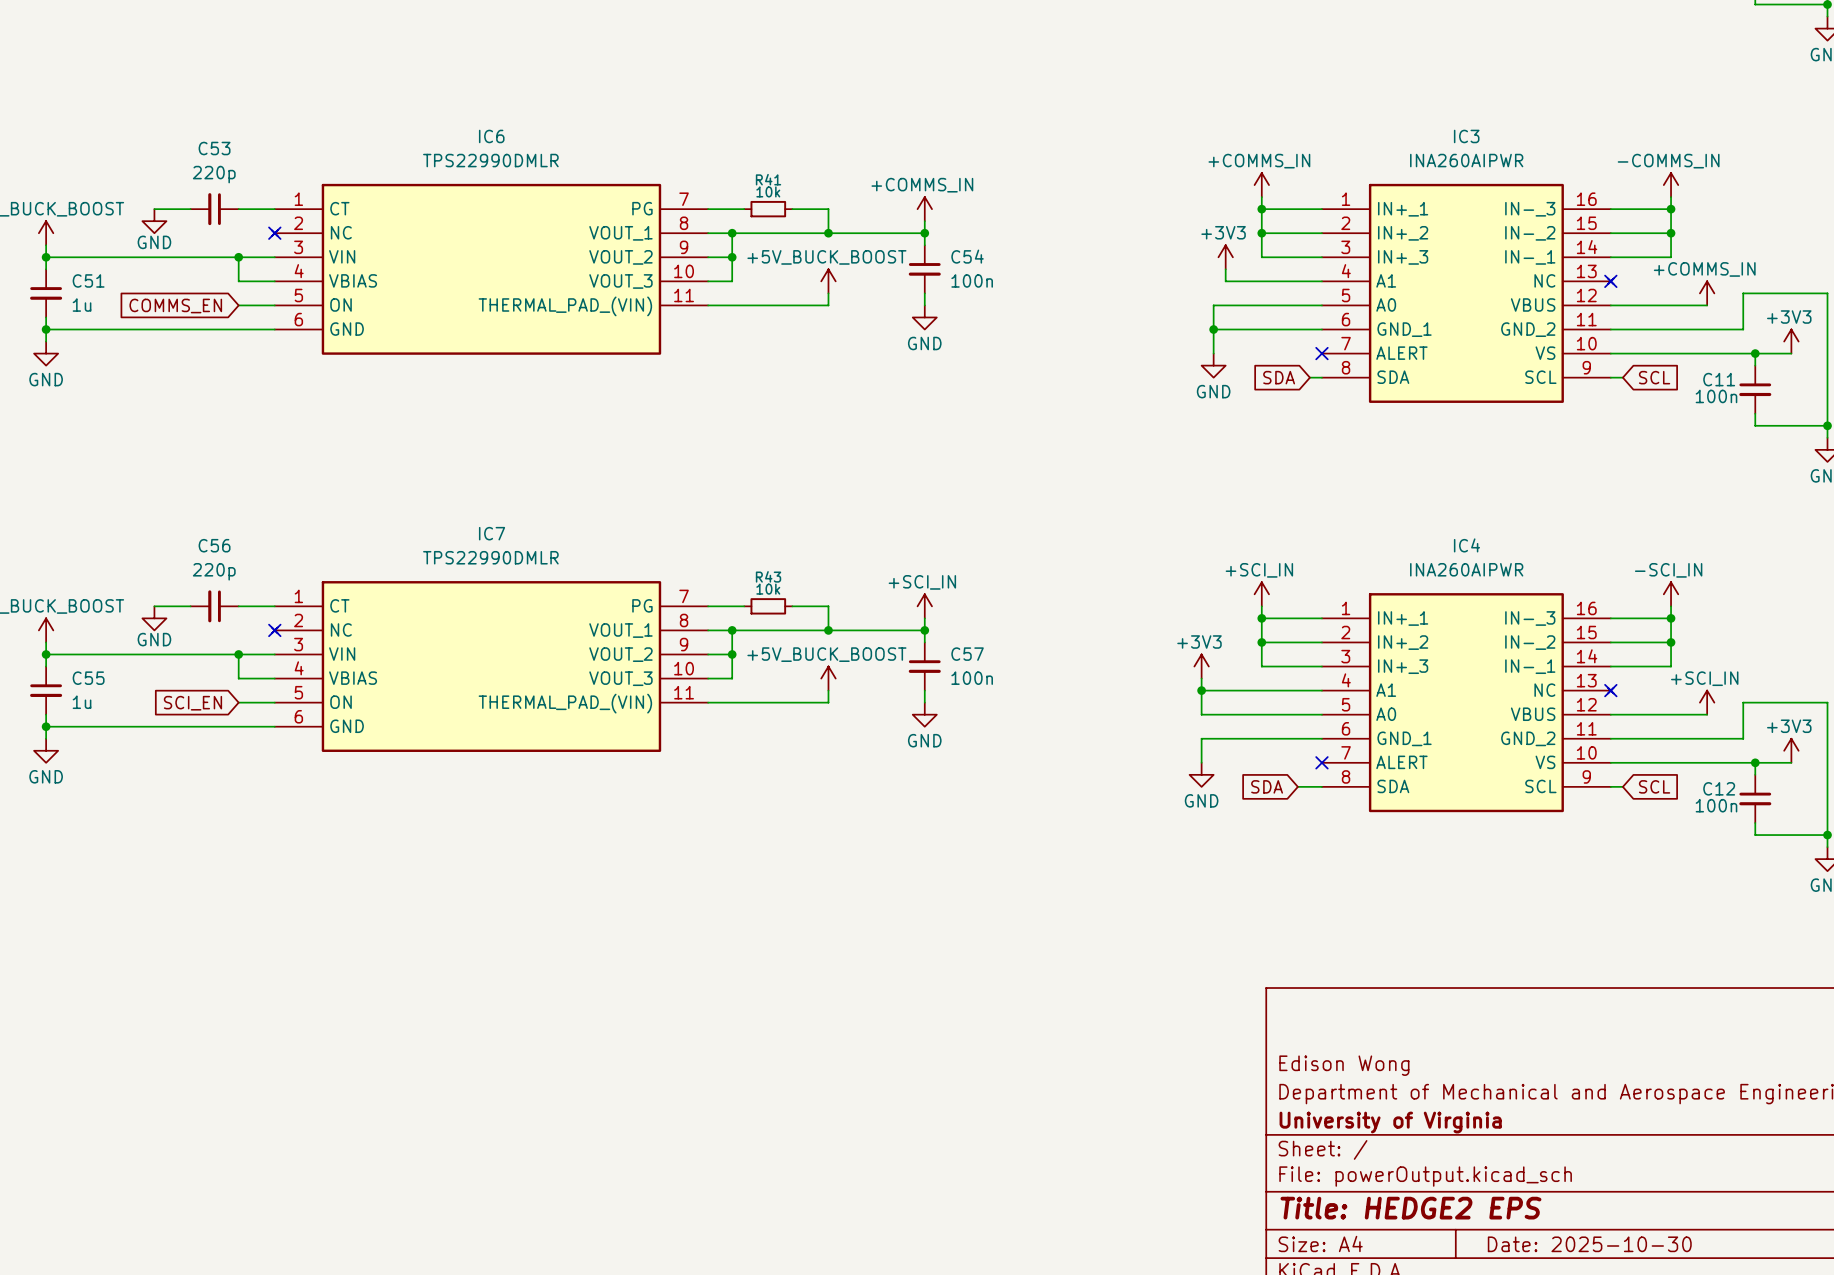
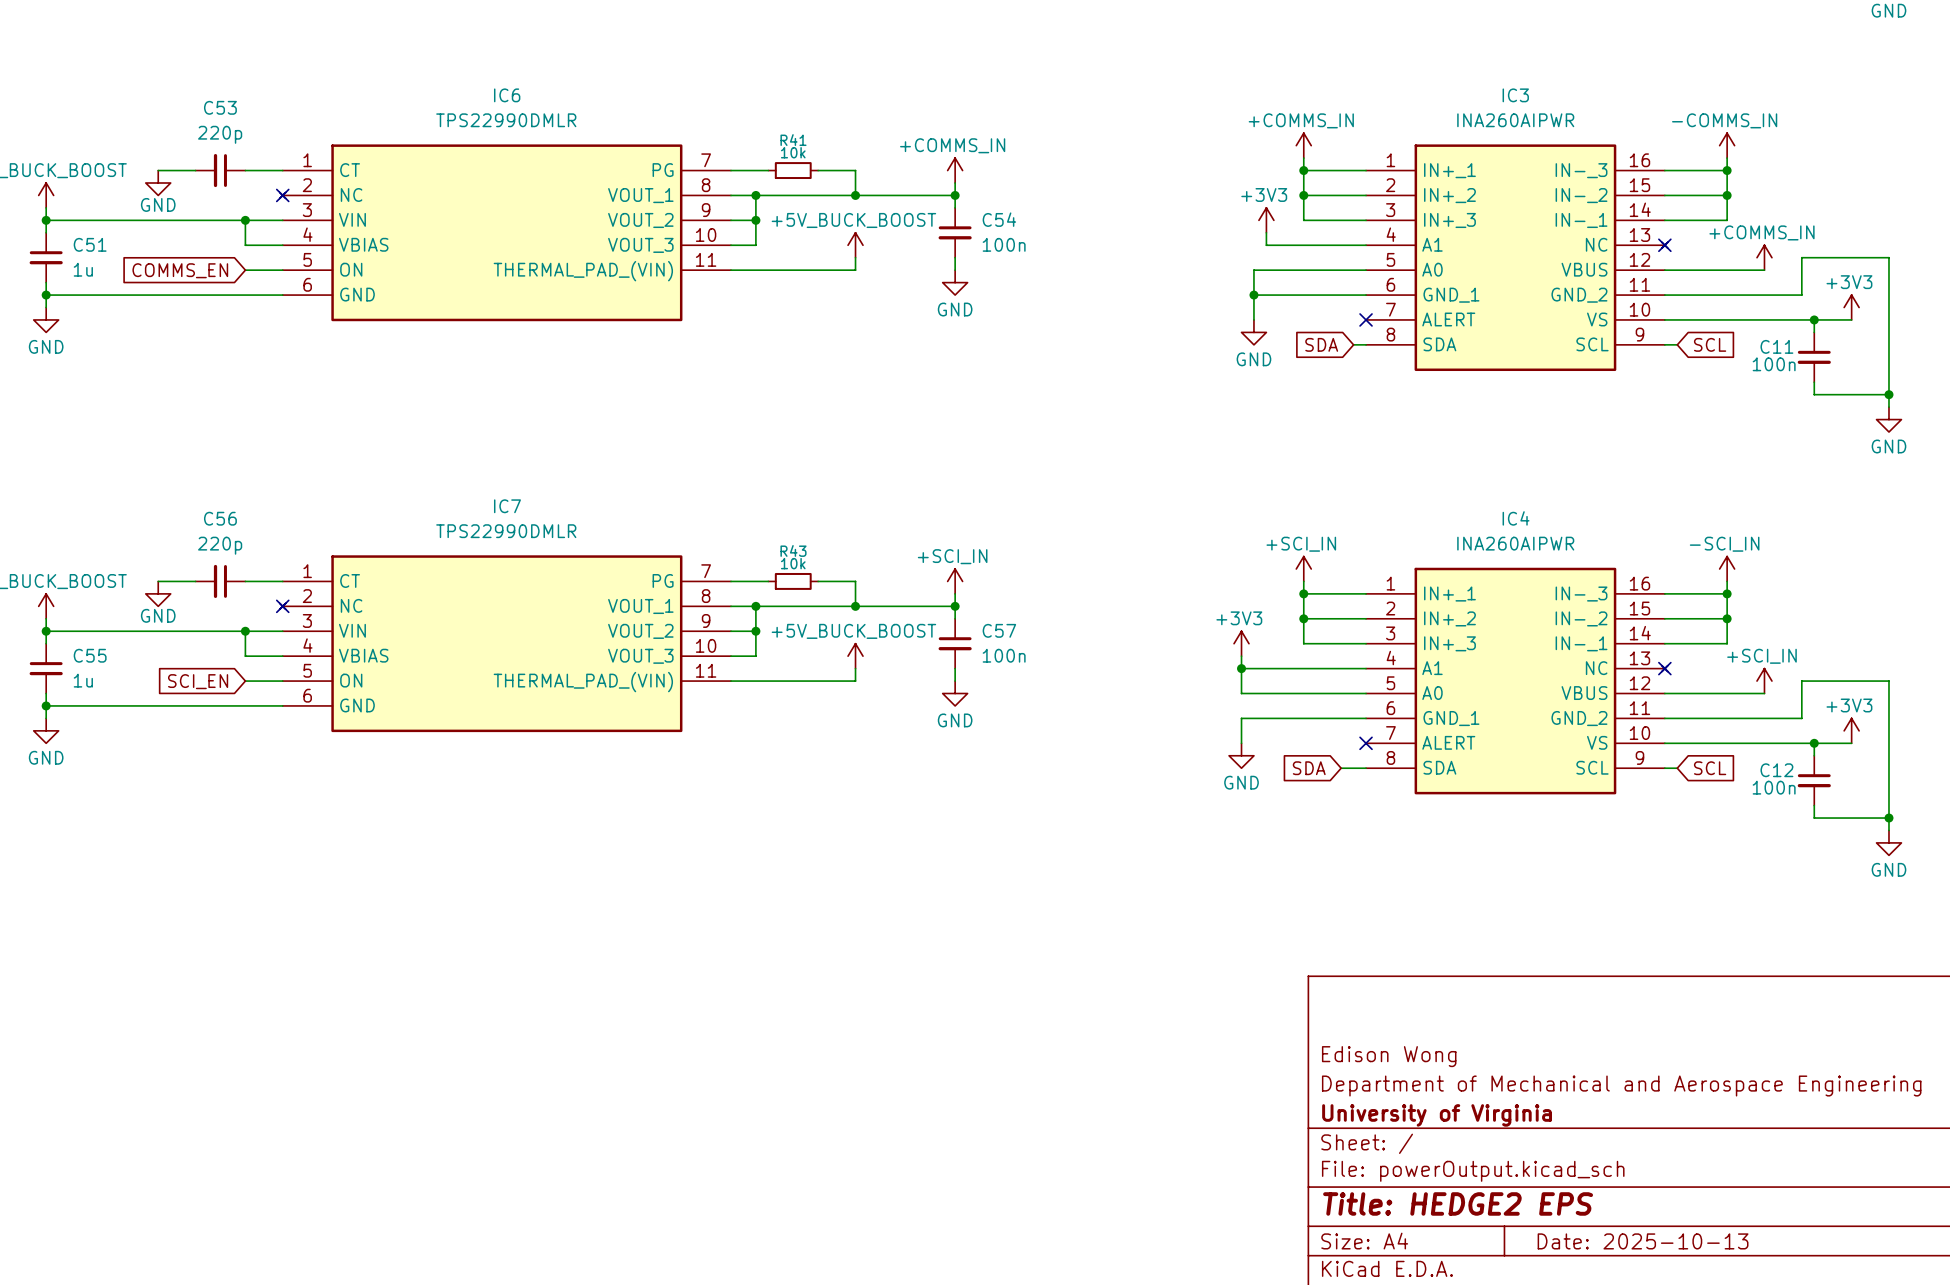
title block: Date: 2025-10-30 (1589, 1244) -> Date: 2025-10-13 (1643, 1241)

